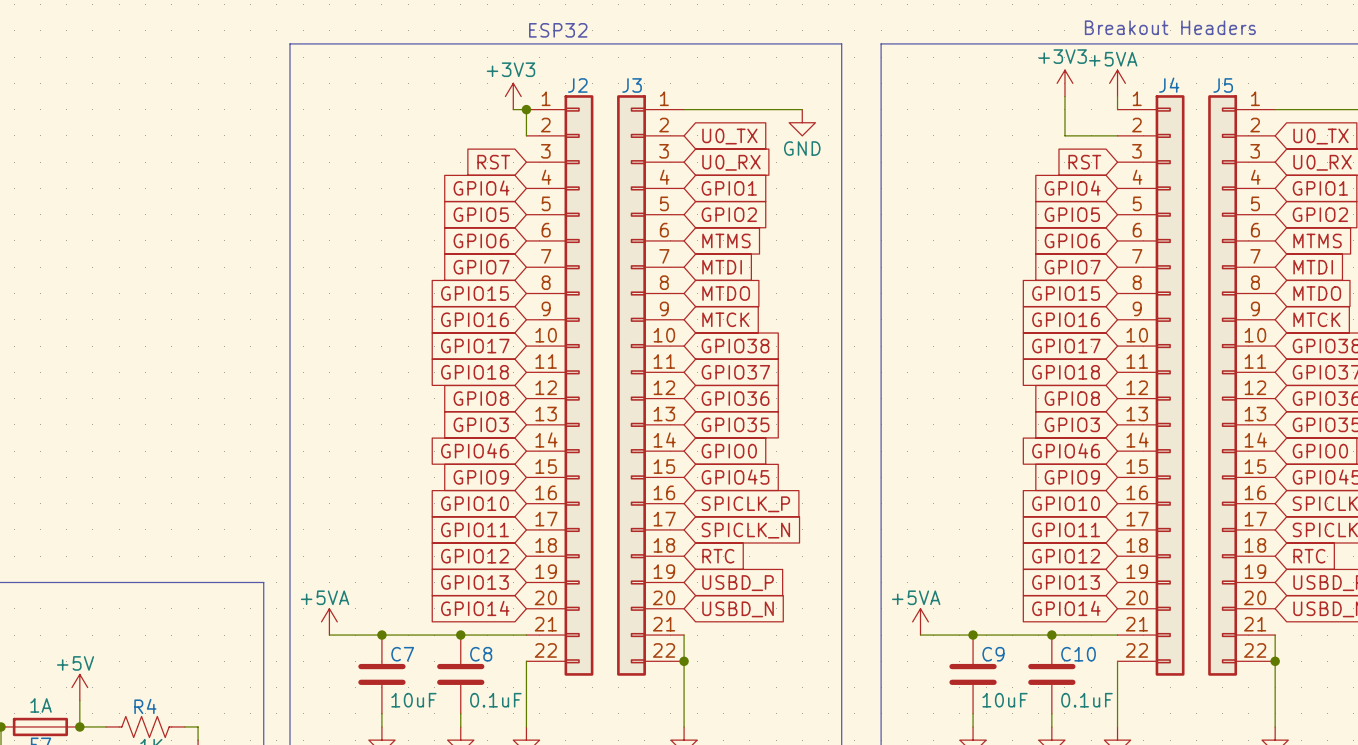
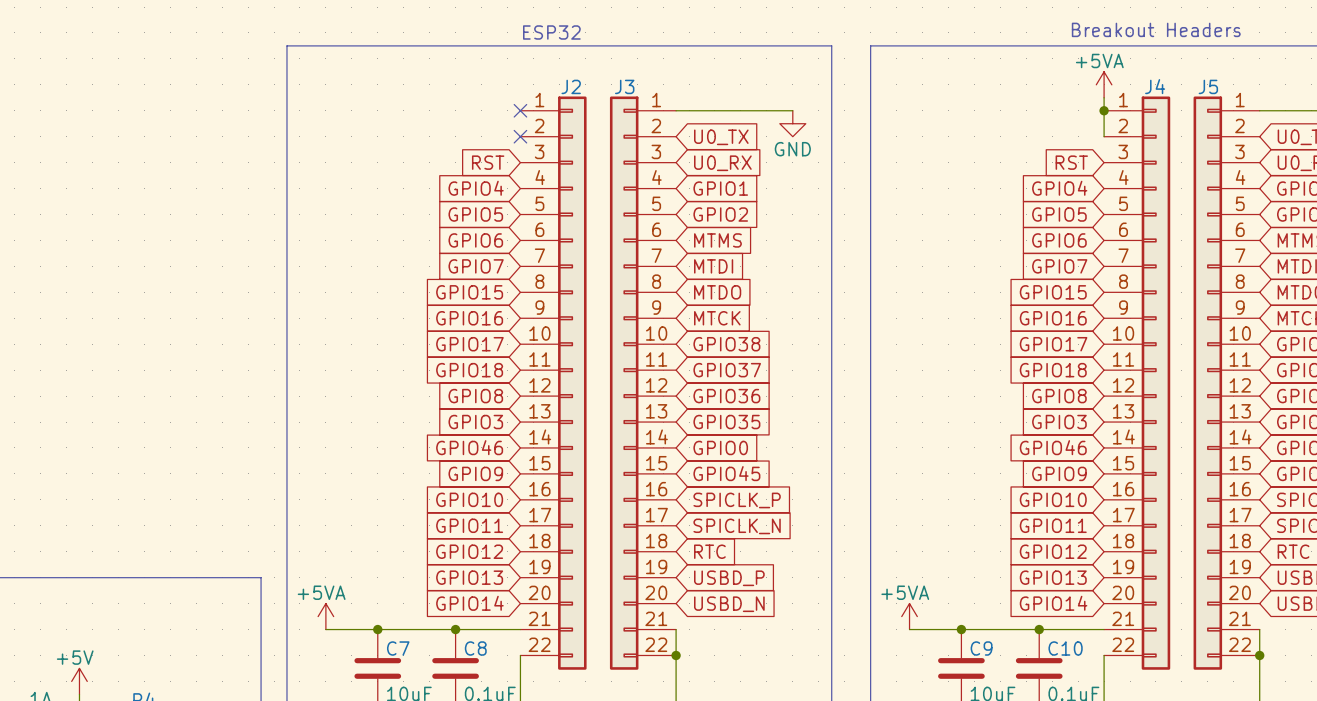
power symbol: +3V3 (1064, 83) -> none
power symbol: +3V3 (513, 96) -> none
wire: (1064, 96) (1064, 135) (1117, 135) -> (1104, 110) (1104, 136)
wire: (513, 109) (526, 109) (526, 135) -> none
junction: (526, 109) -> none
no-connect mark: none -> (520, 110)
junction: none -> (1104, 110)
no-connect mark: none -> (520, 136)

